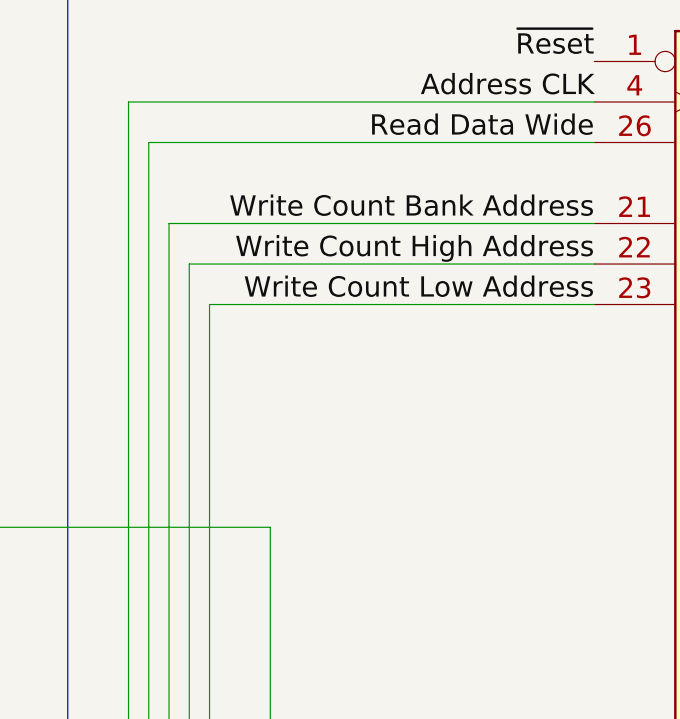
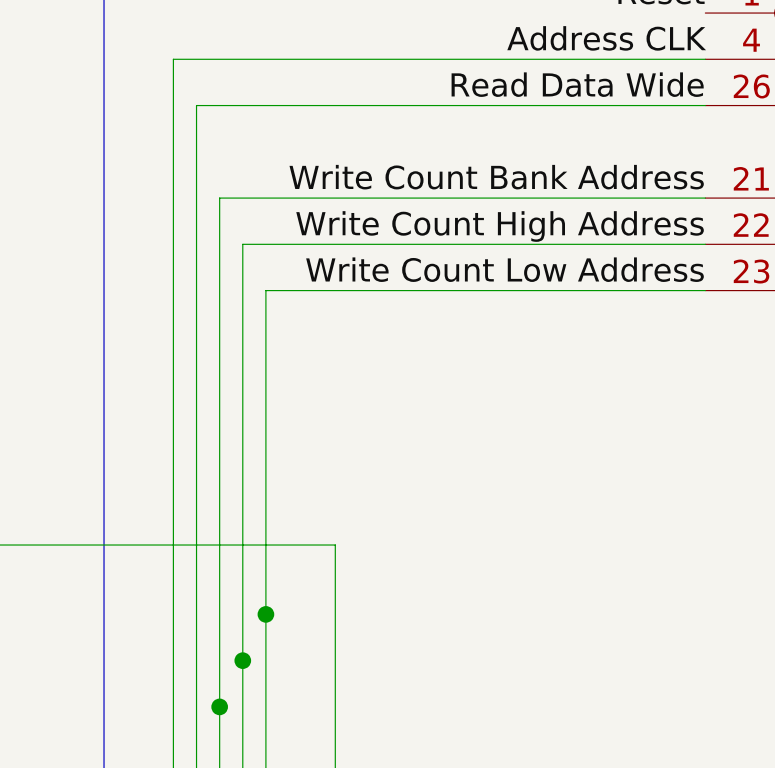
junction: none -> (265, 614)
junction: none -> (242, 660)
junction: none -> (219, 706)

